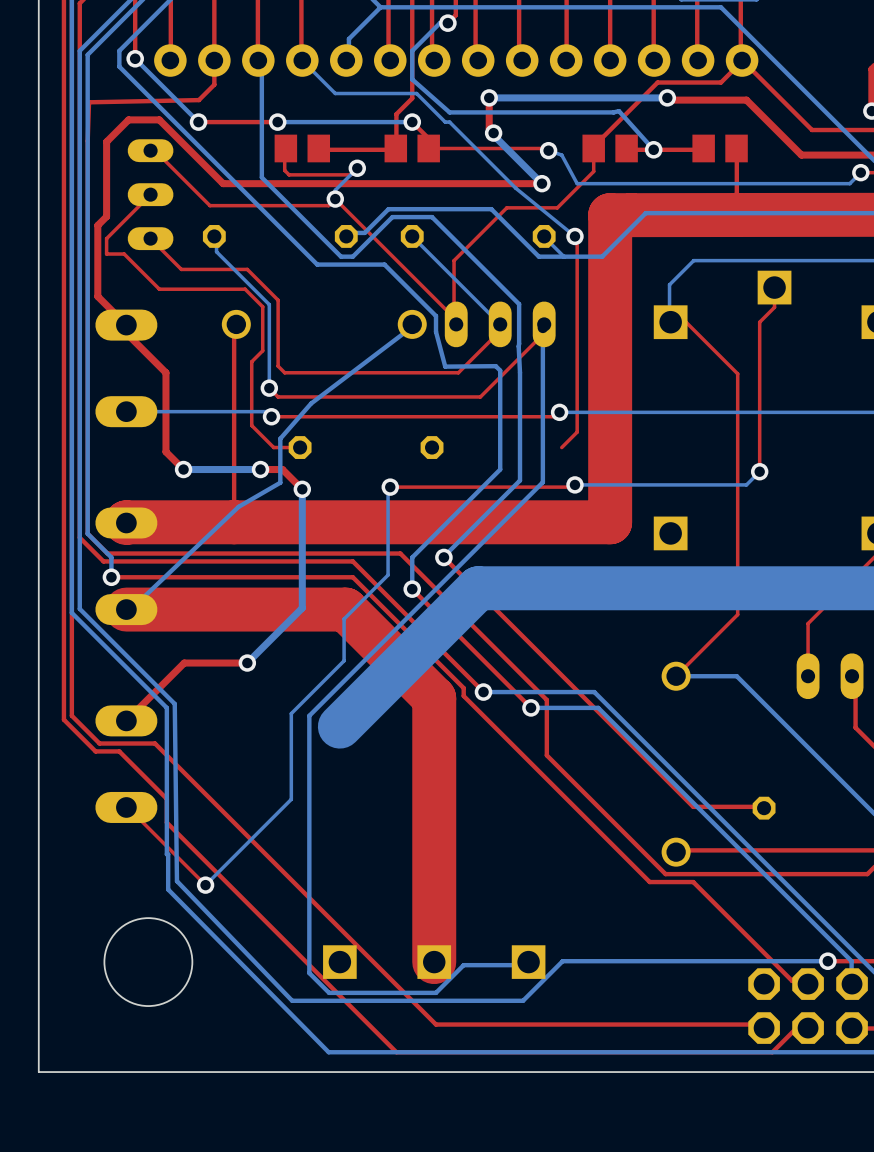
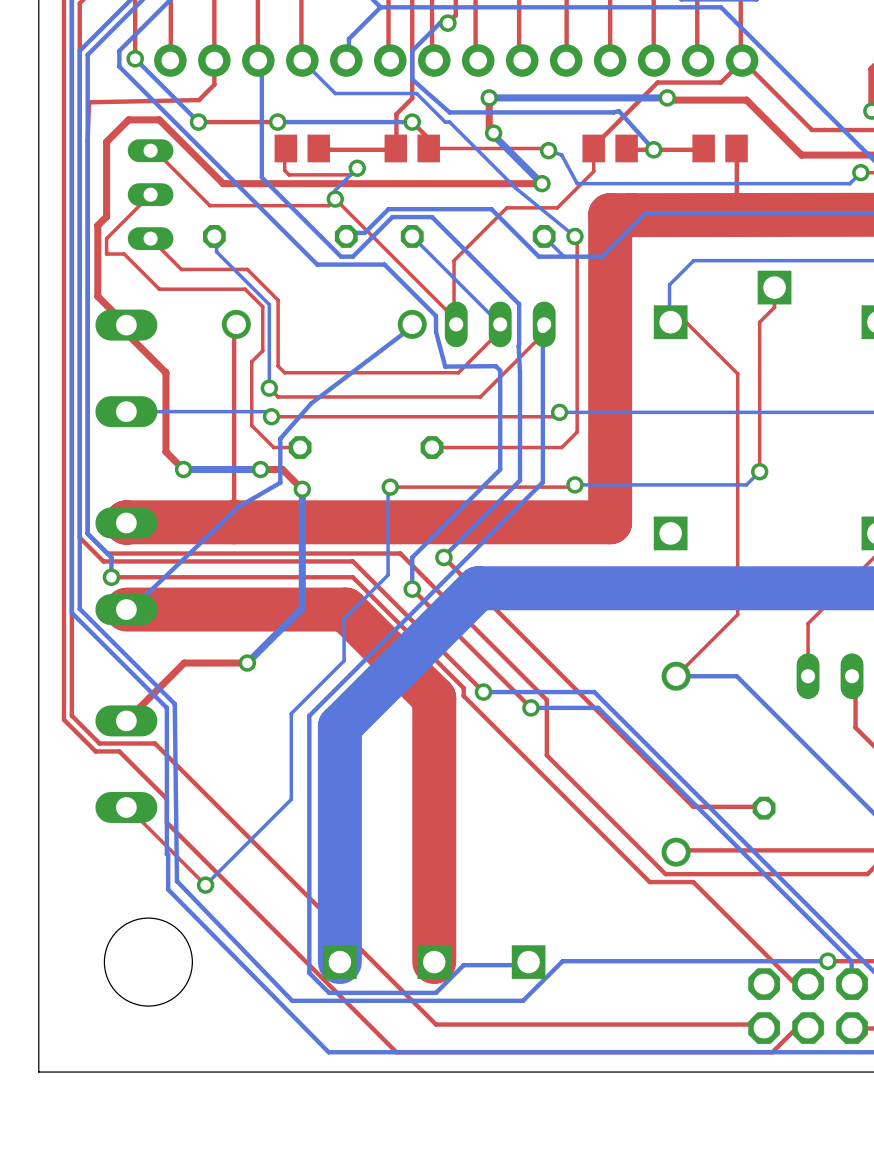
top track: none -> (561, 447) (432, 447)
bottom track: none -> (339, 726) (339, 962)

